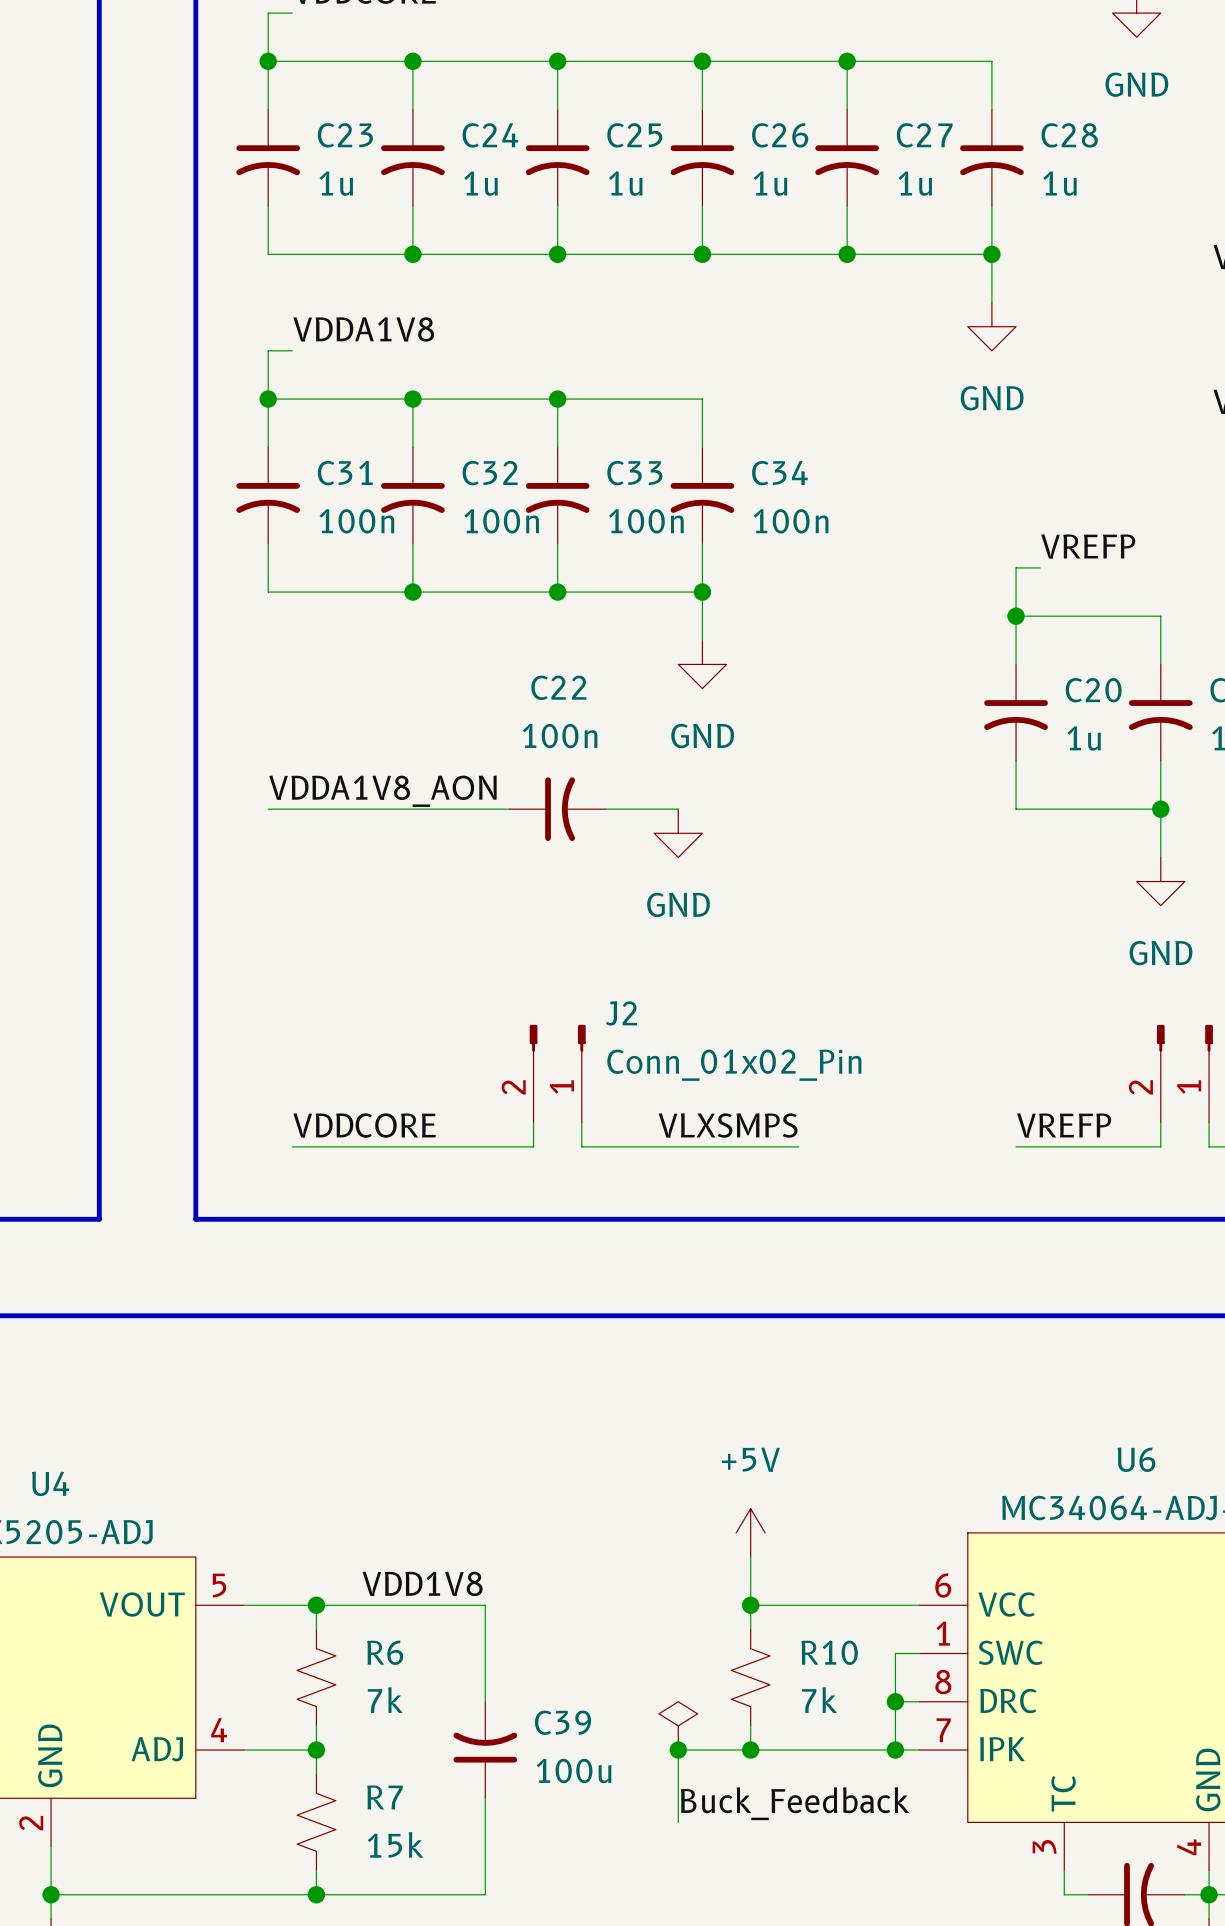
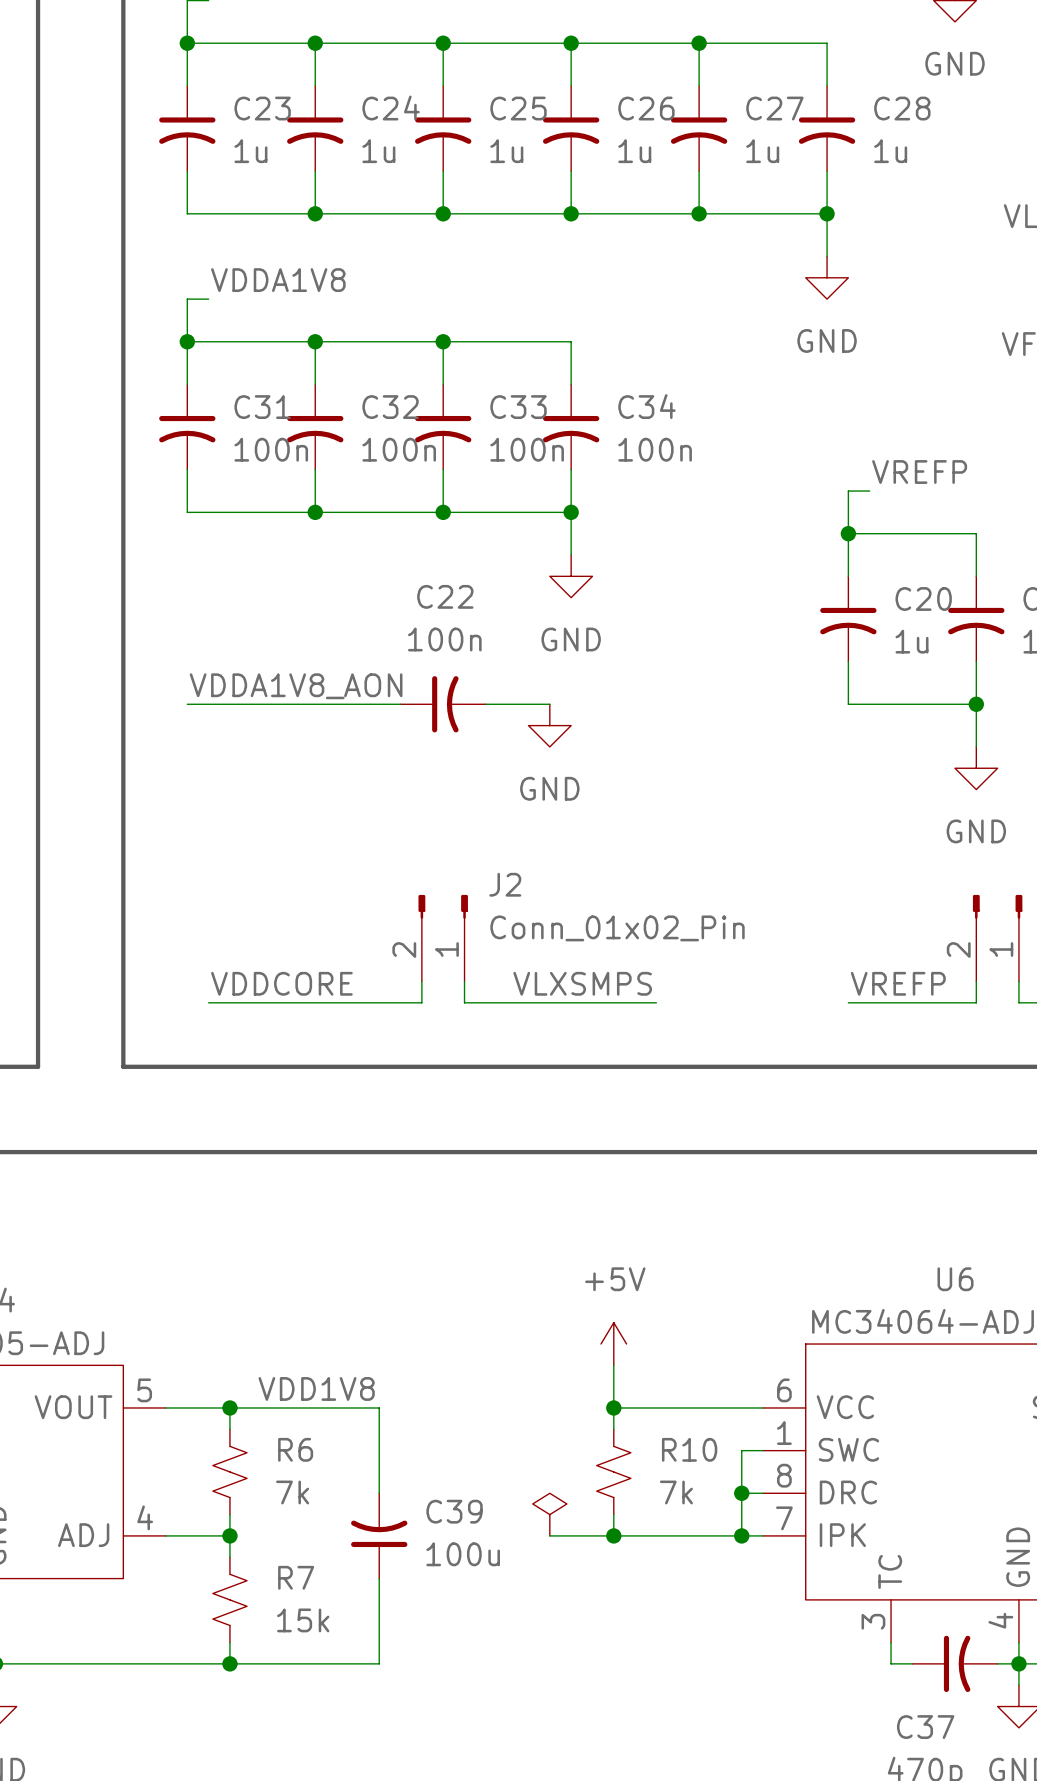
wire: (678, 1750) (678, 1822) -> none
junction: (678, 1750) -> none
label: Buck_Feedback (795, 1803) -> none

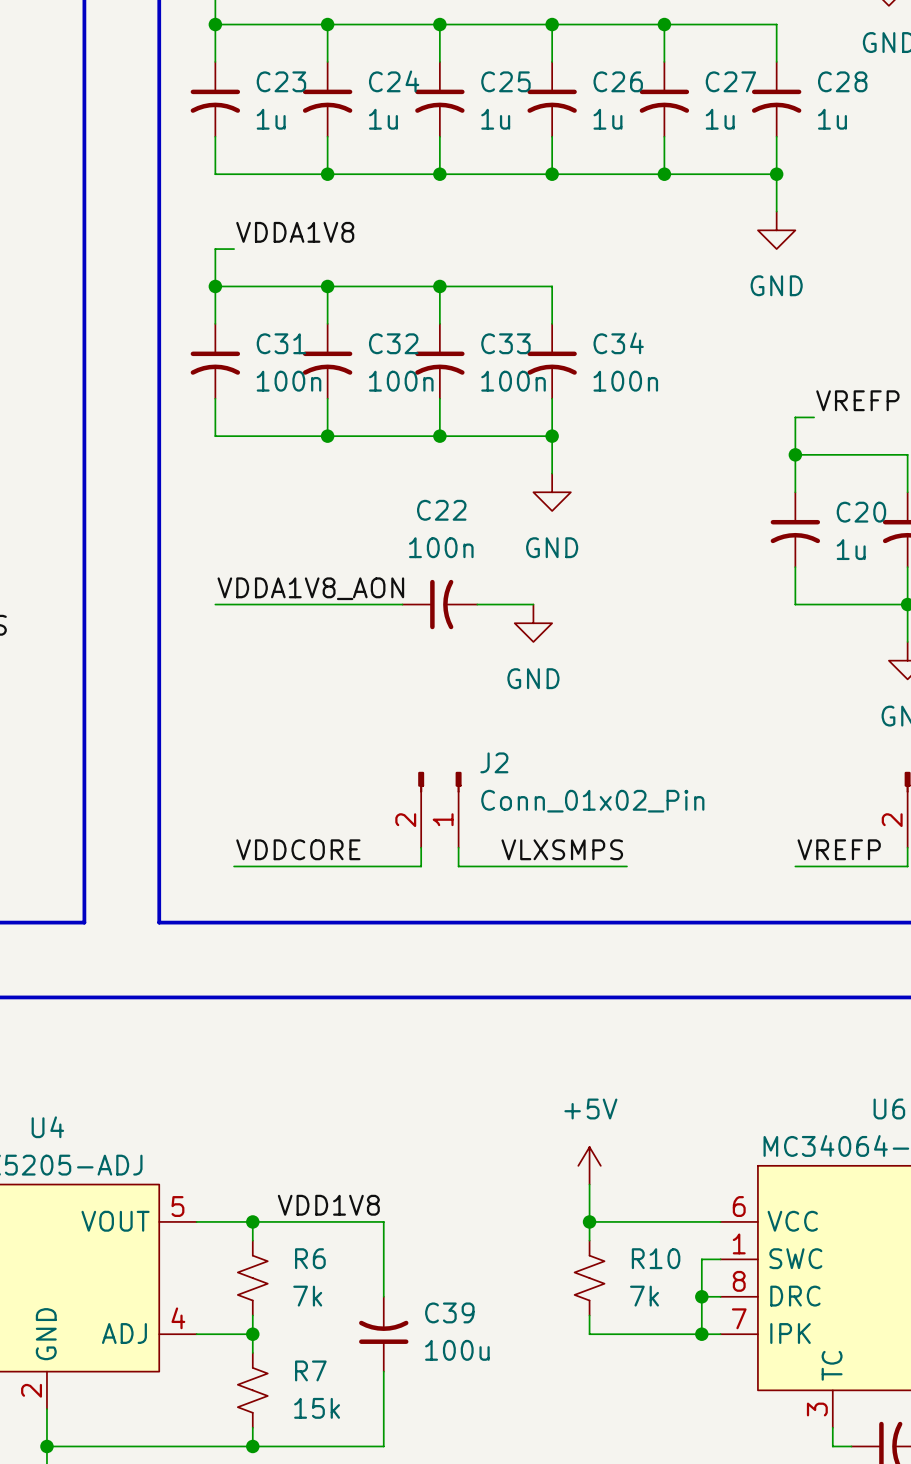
power symbol: (549, 1514) -> none
wire: (549, 1535) (613, 1535) -> none
junction: (613, 1535) -> none

